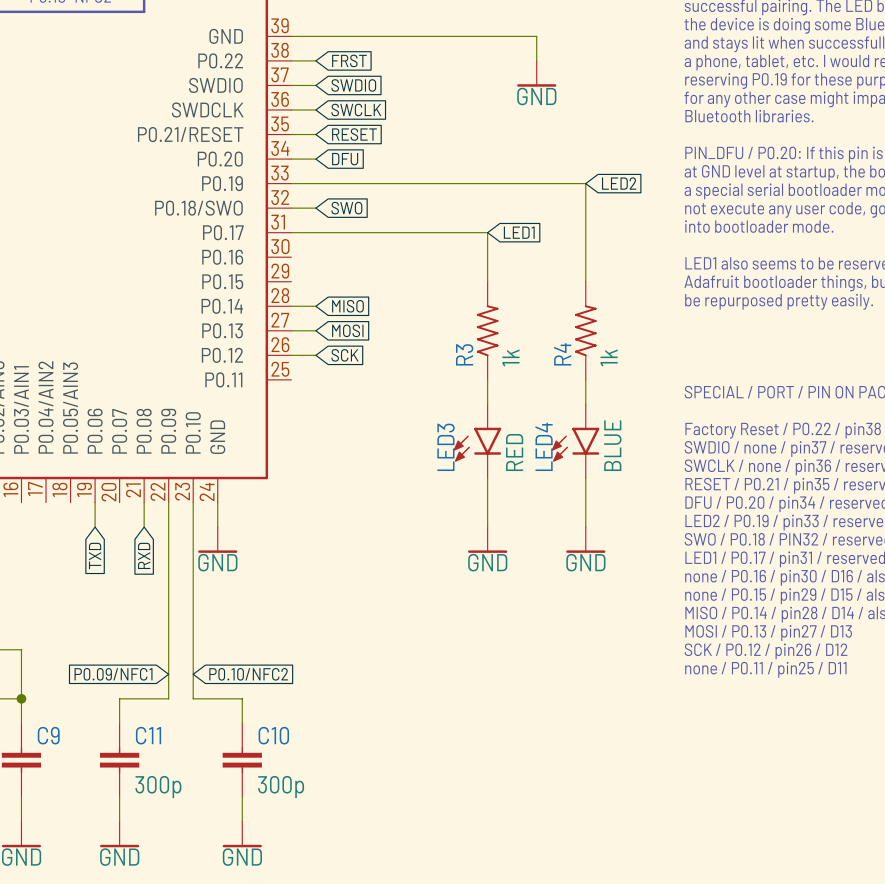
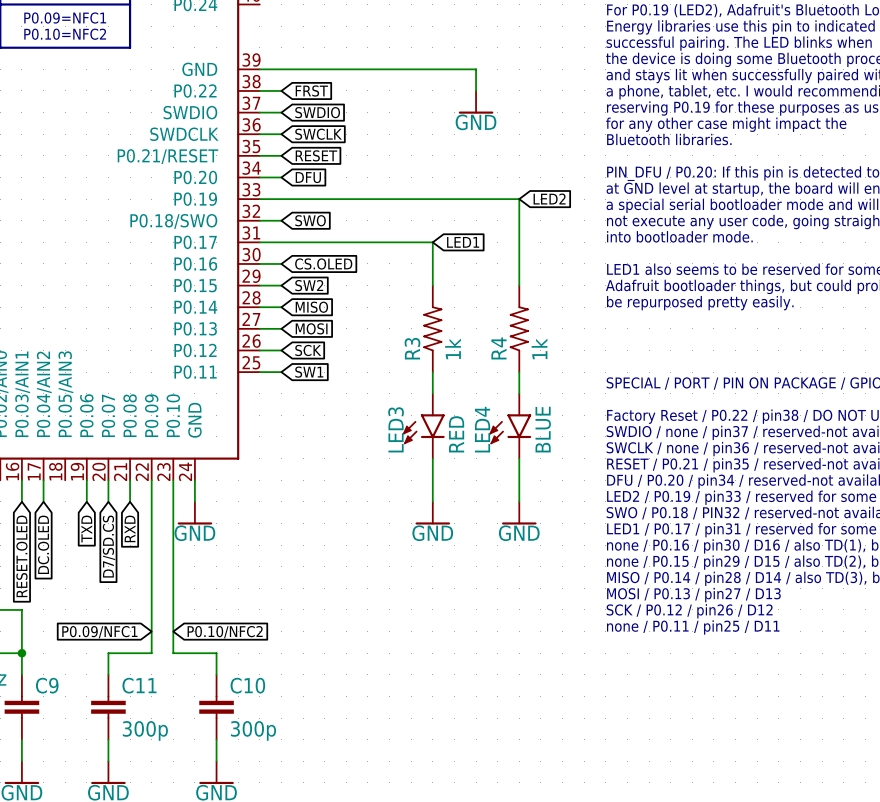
wire: none -> (259, 263) (281, 263)
global label: none -> CS.OLED (323, 263)
wire: none -> (259, 285) (281, 285)
global label: none -> SW2 (309, 285)
wire: none -> (259, 372) (281, 372)
global label: none -> SW1 (309, 372)
wire: none -> (21, 480) (21, 501)
wire: none -> (43, 480) (43, 501)
wire: none -> (108, 480) (108, 501)
global label: none -> DC.OLED (43, 544)
global label: none -> D7/SD.CS (109, 546)
global label: none -> RESET.OLED (21, 556)

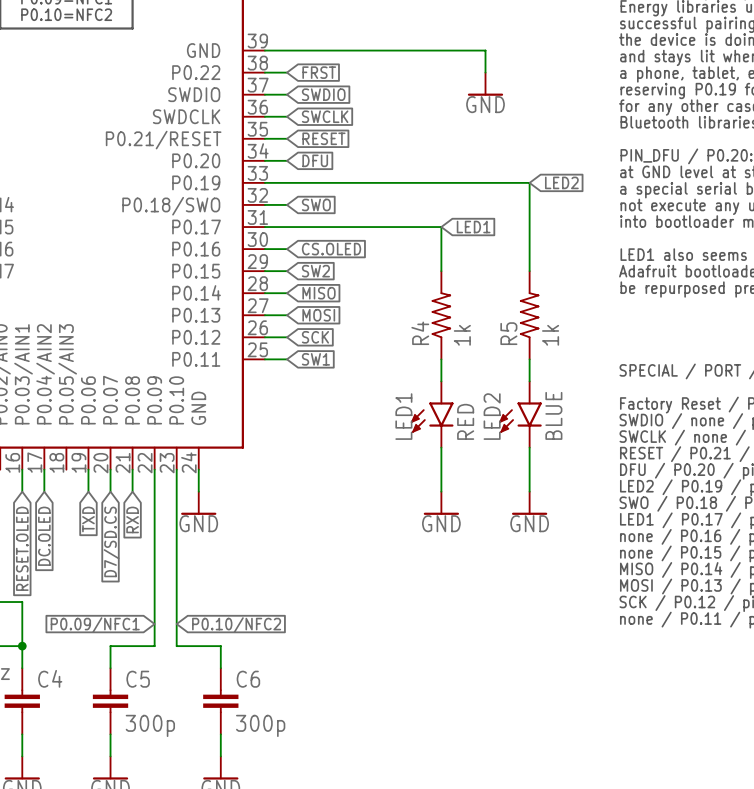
R3 name: R3 (412, 348) -> R4 (420, 333)
R4 name: R4 (498, 348) -> R5 (508, 333)
LED3 name: LED3 (396, 429) -> LED1 (403, 416)
LED4 name: LED4 (482, 429) -> LED2 (492, 416)
C9 name: C9 (47, 685) -> C4 (50, 678)
C11 name: C11 (139, 685) -> C5 (138, 679)
C10 name: C10 (247, 685) -> C6 (248, 679)

